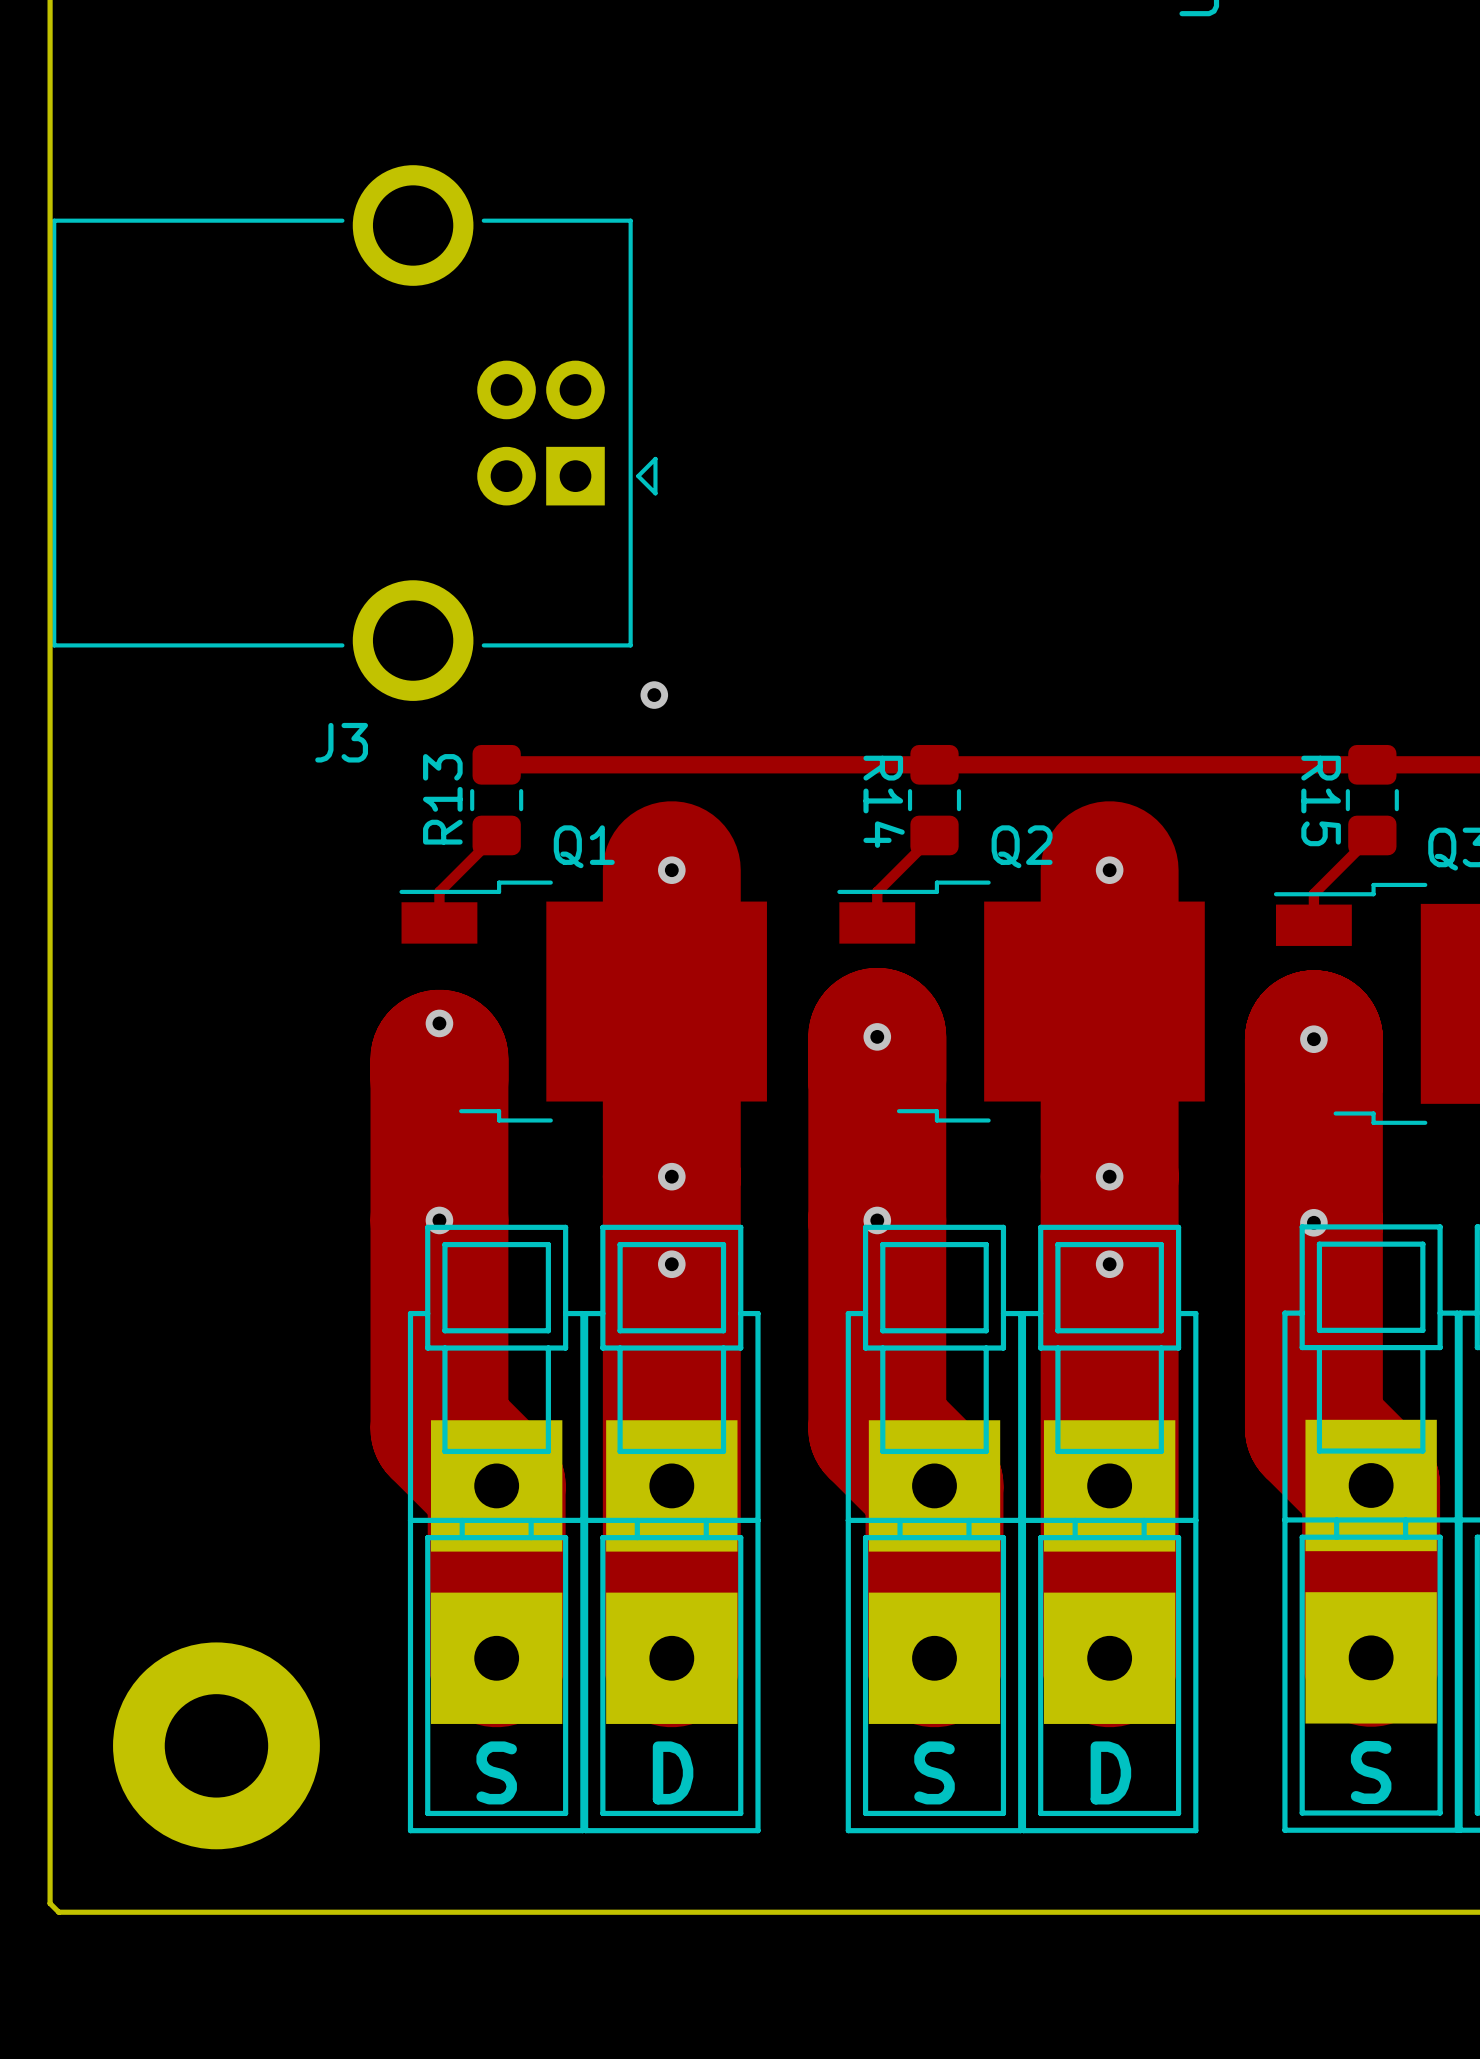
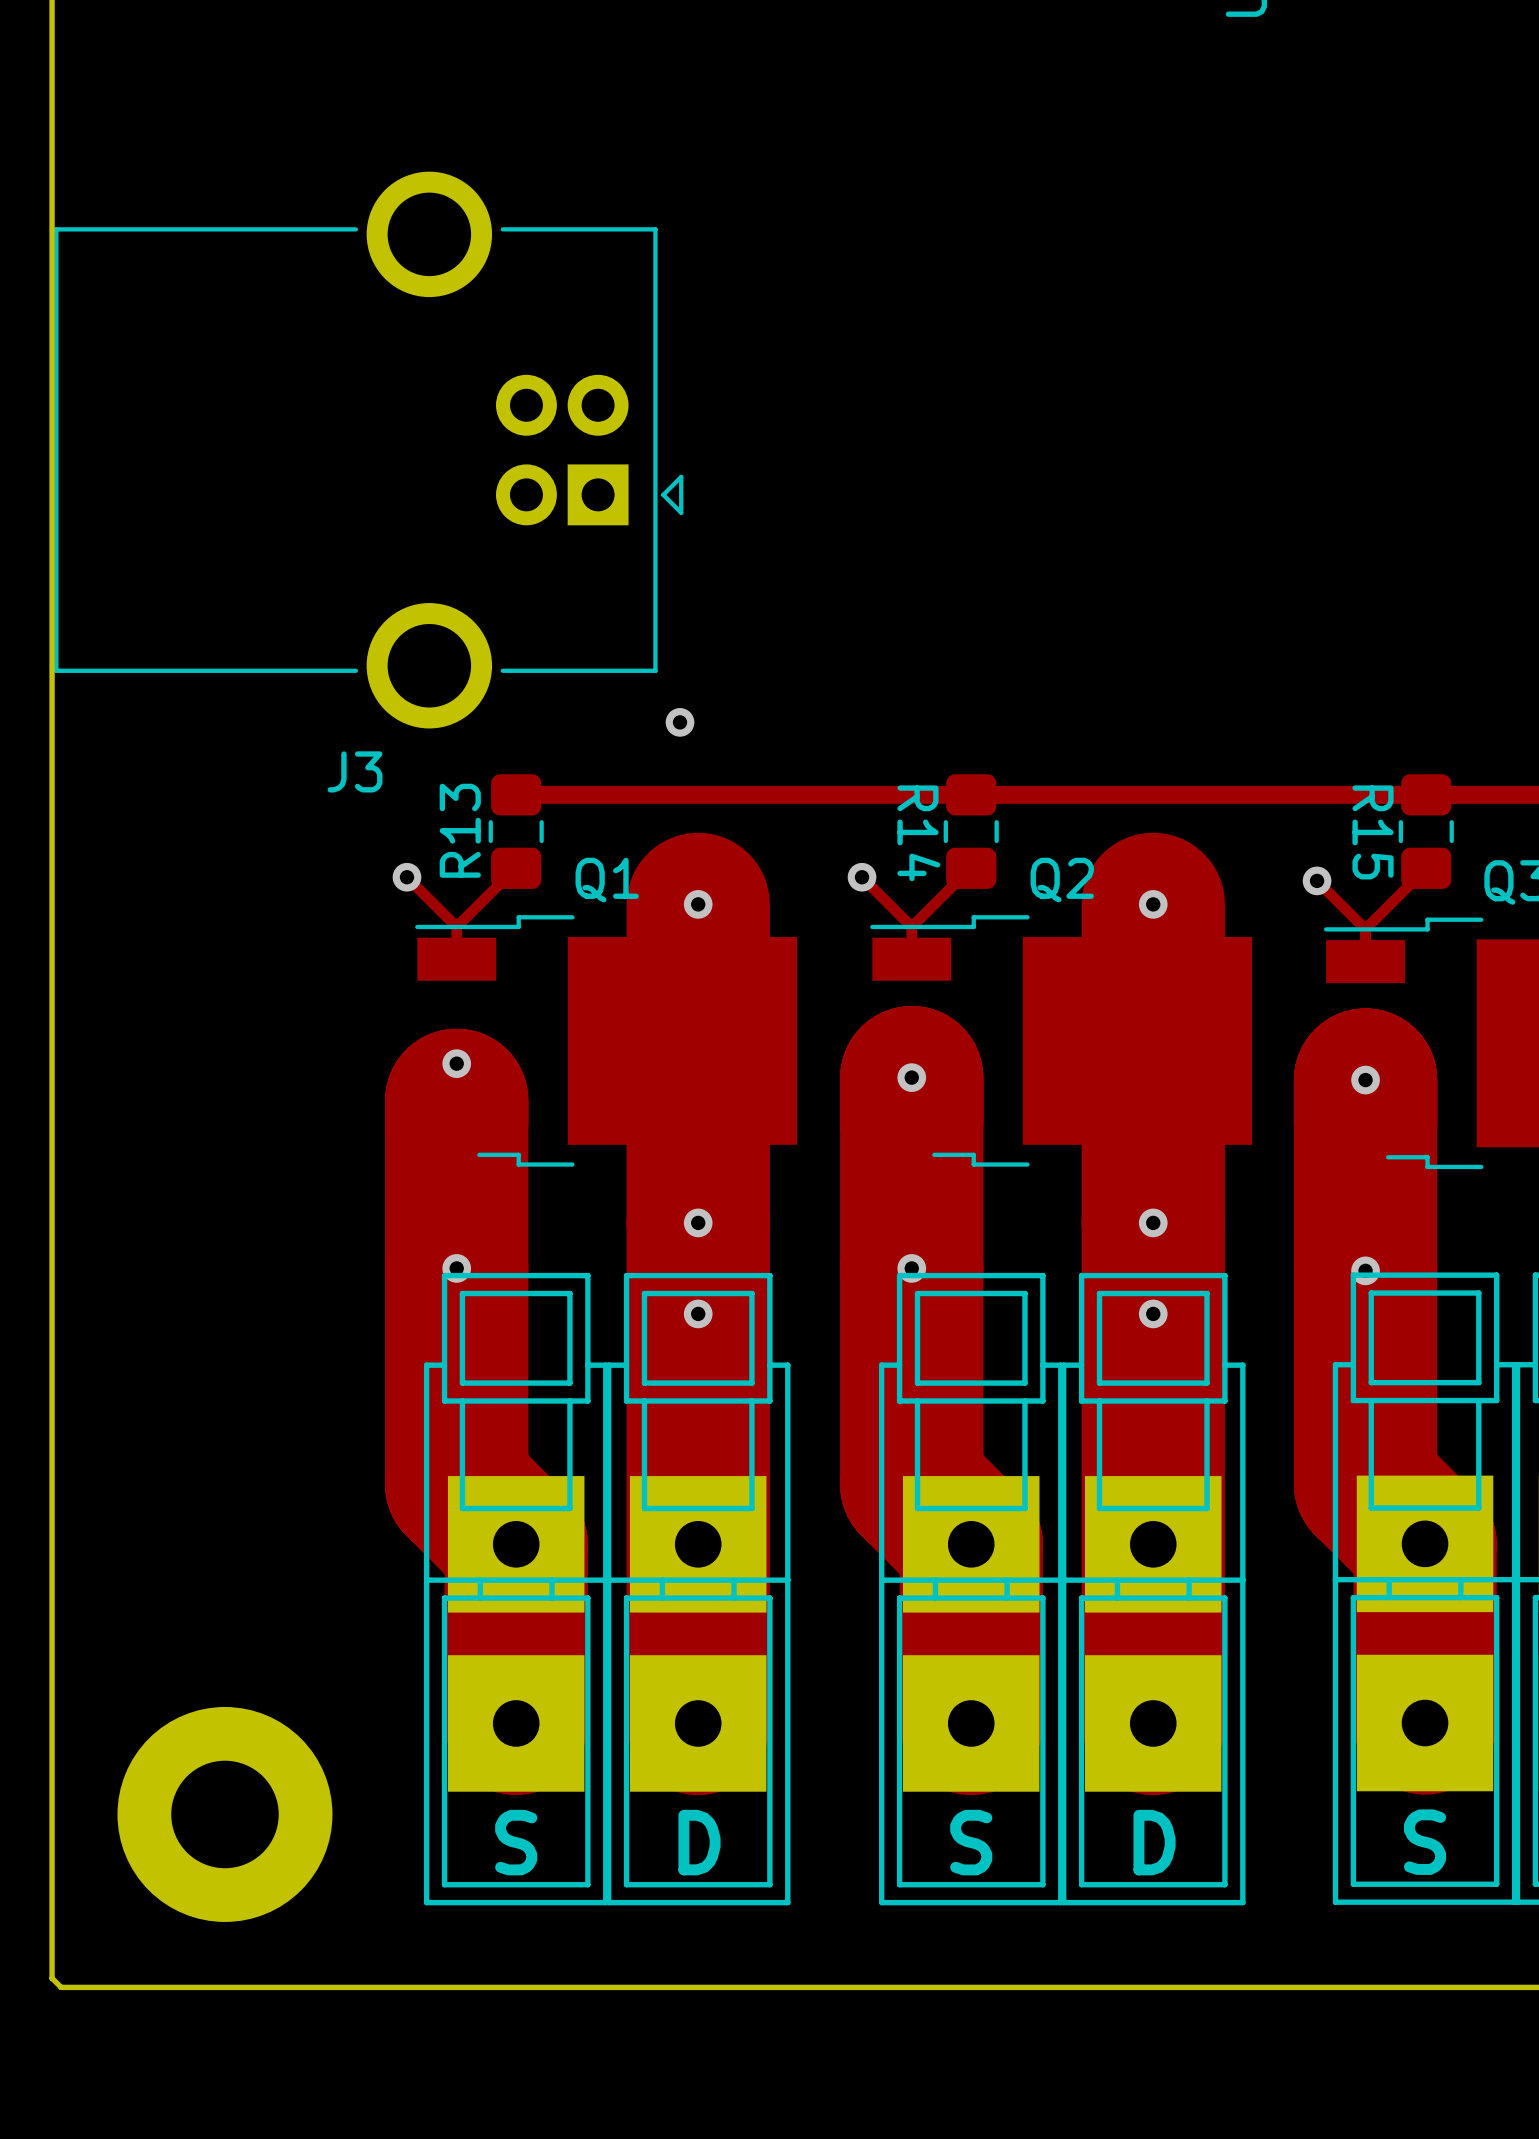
track: none -> (406, 877) (456, 926)
via: none -> (406, 877)
track: none -> (862, 877) (911, 926)
via: none -> (862, 877)
track: none -> (1317, 880) (1365, 929)
via: none -> (1317, 880)

